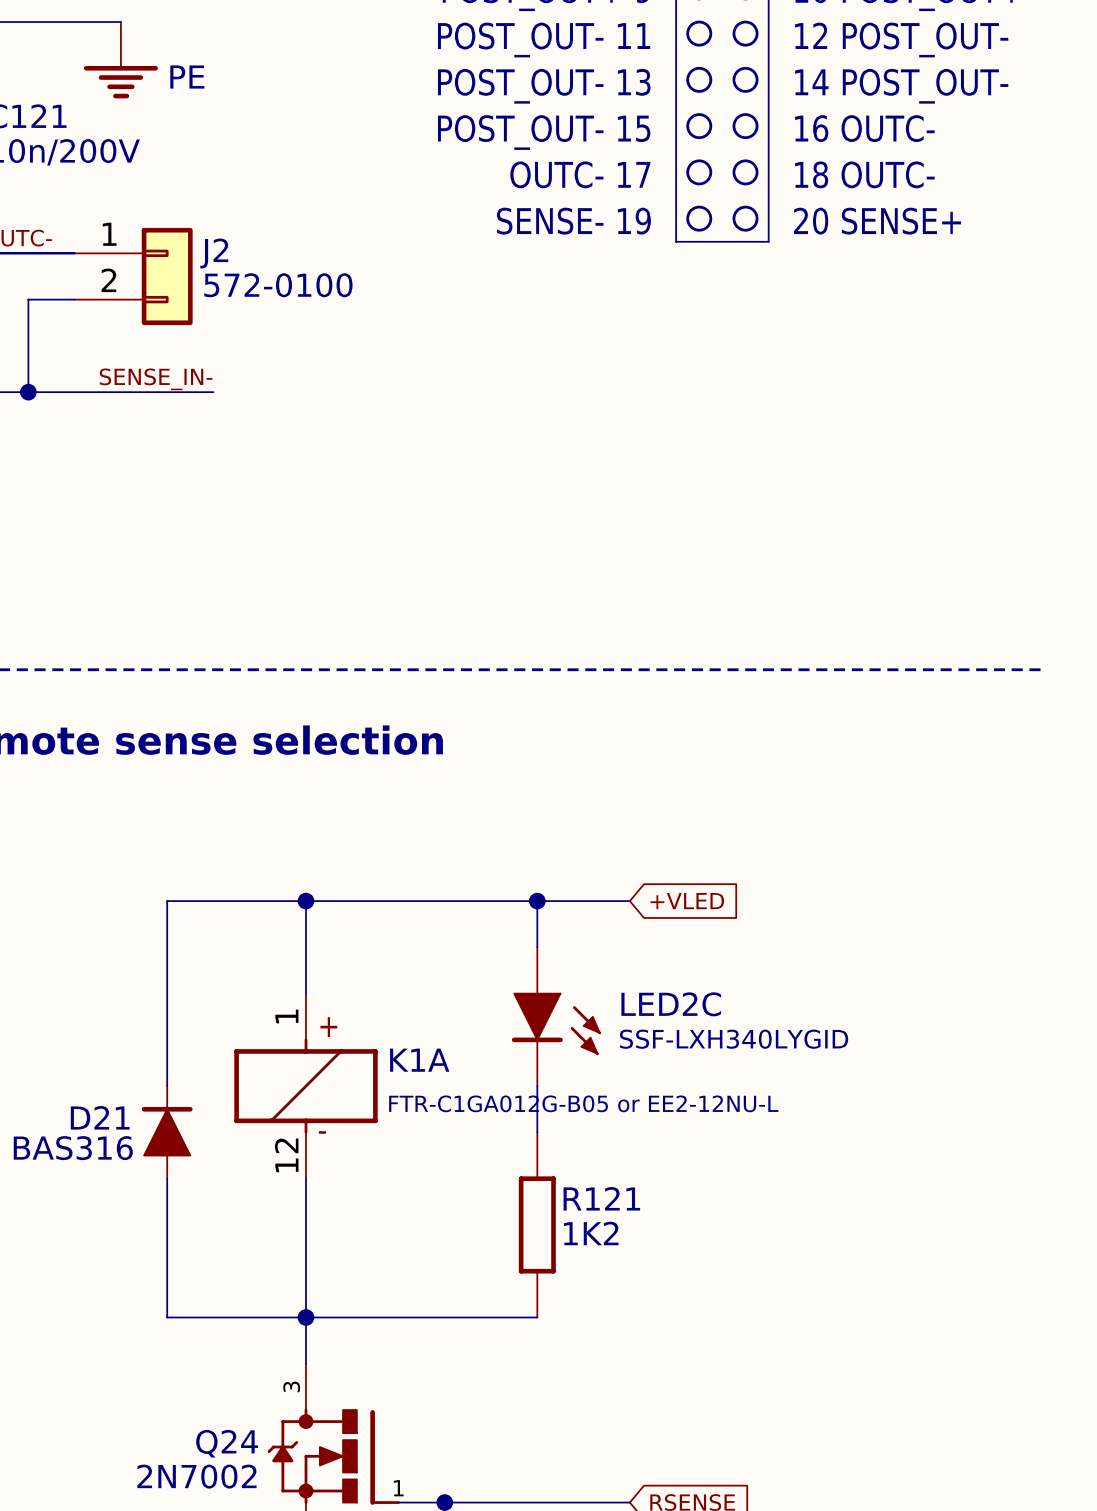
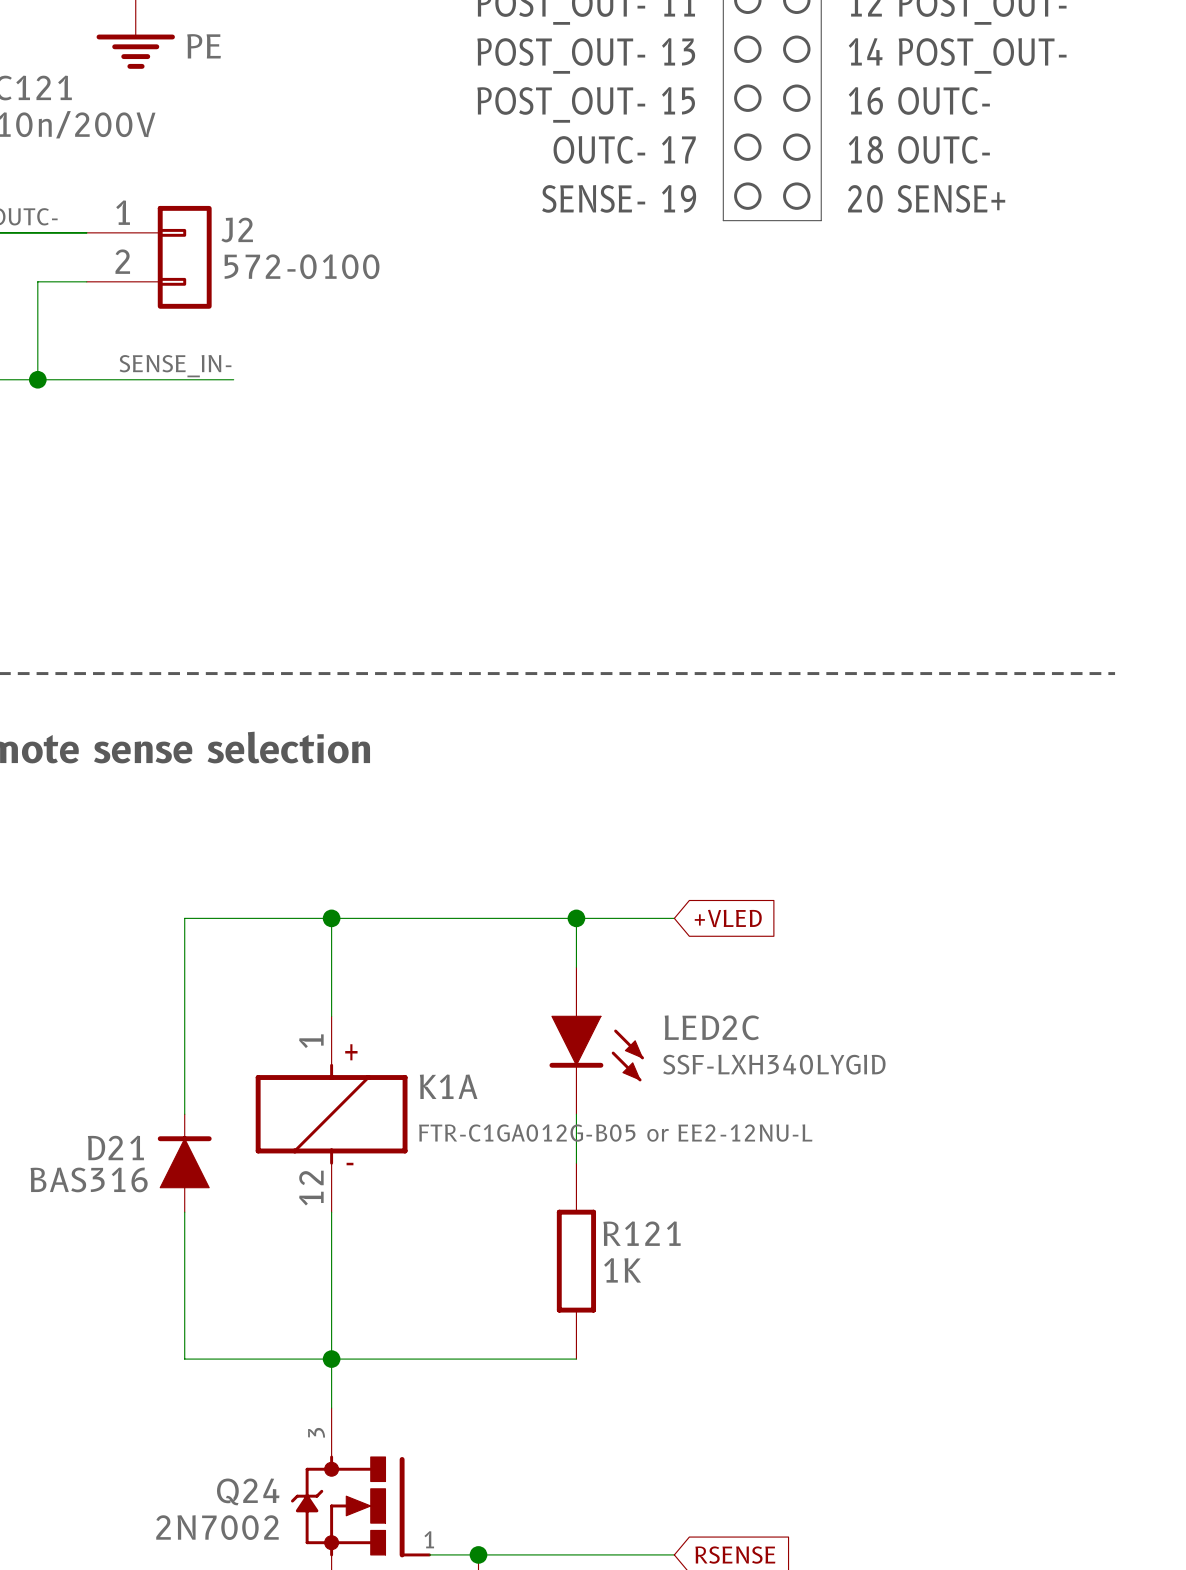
R121 value: 1K2 (591, 1233) -> 1K (622, 1270)

